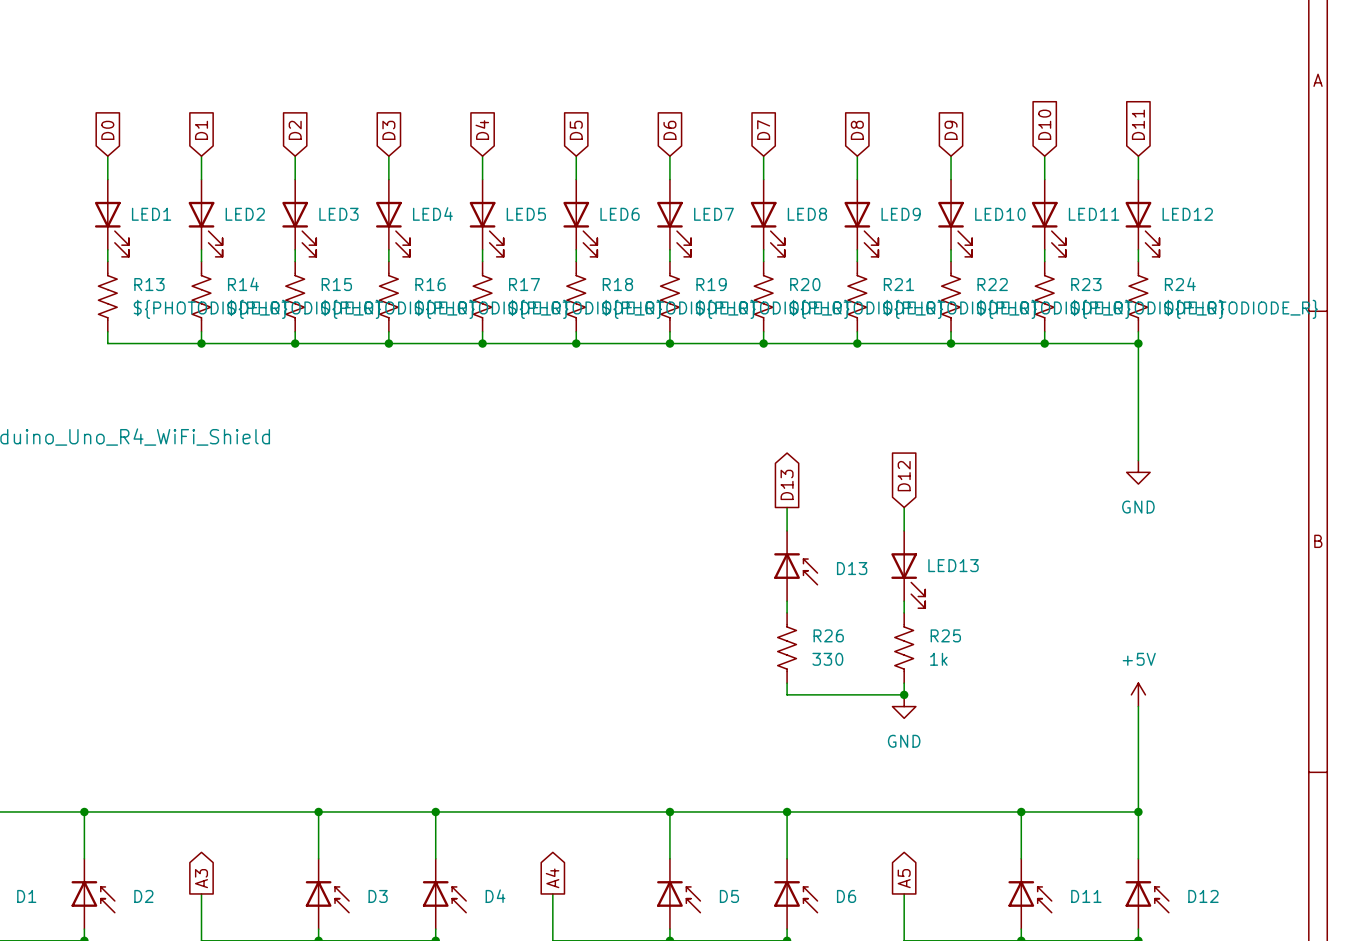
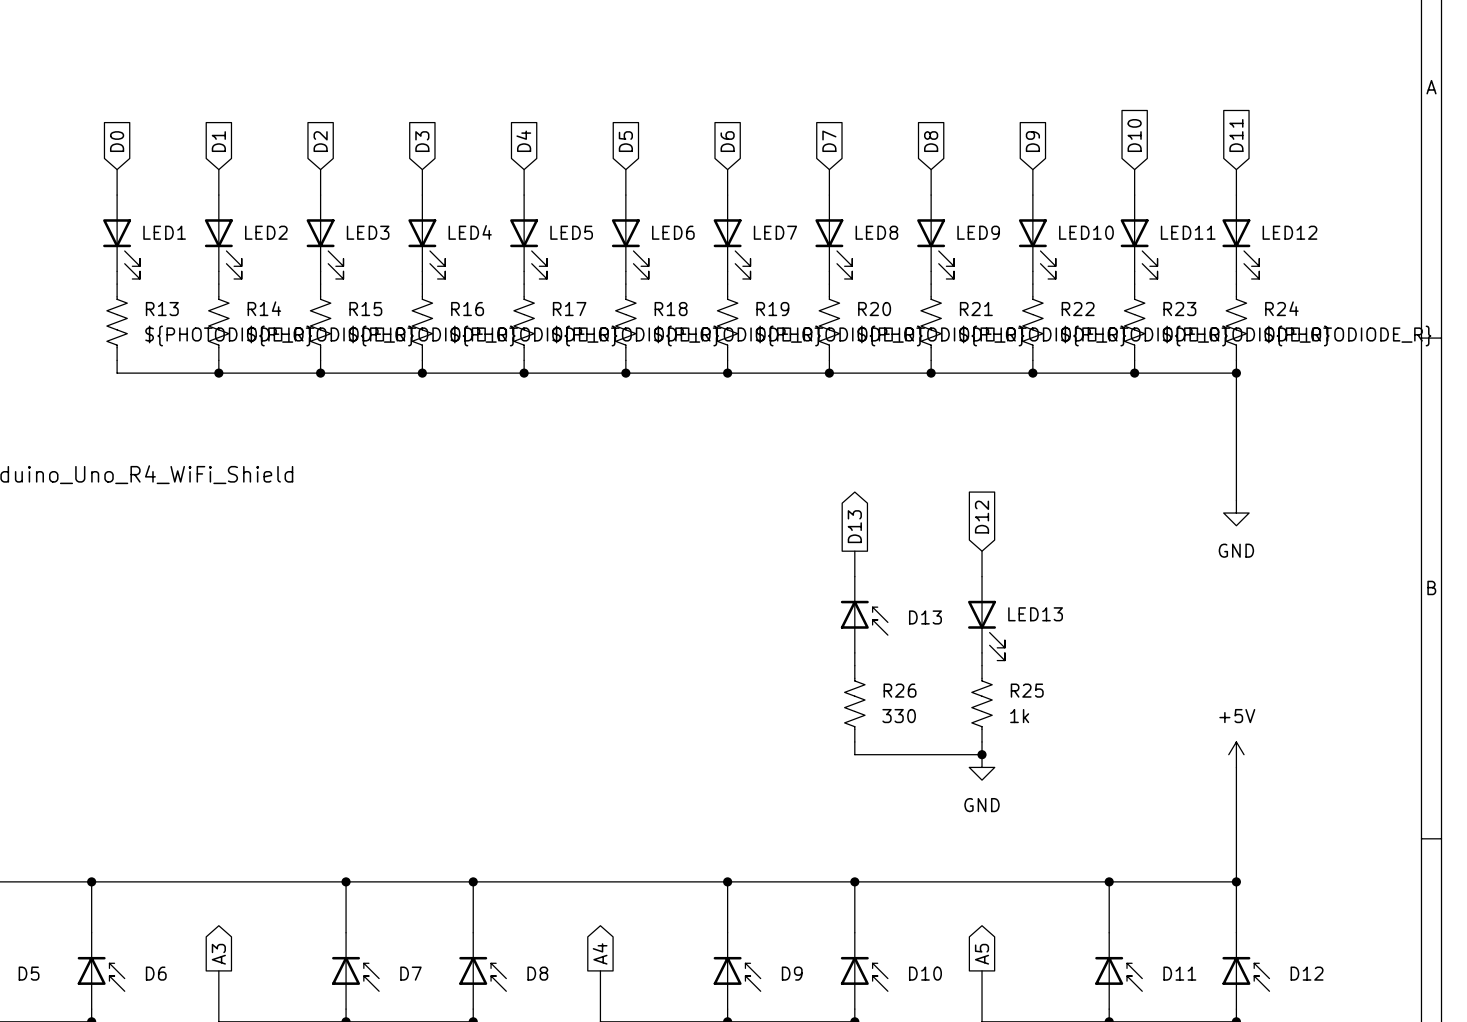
D1 name: D1 (26, 896) -> D5 (29, 973)
D2 name: D2 (143, 896) -> D6 (156, 973)
D3 name: D3 (378, 896) -> D7 (410, 973)
D4 name: D4 (495, 896) -> D8 (537, 973)
D5 name: D5 (729, 896) -> D9 (792, 973)
D6 name: D6 (846, 896) -> D10 (925, 973)

